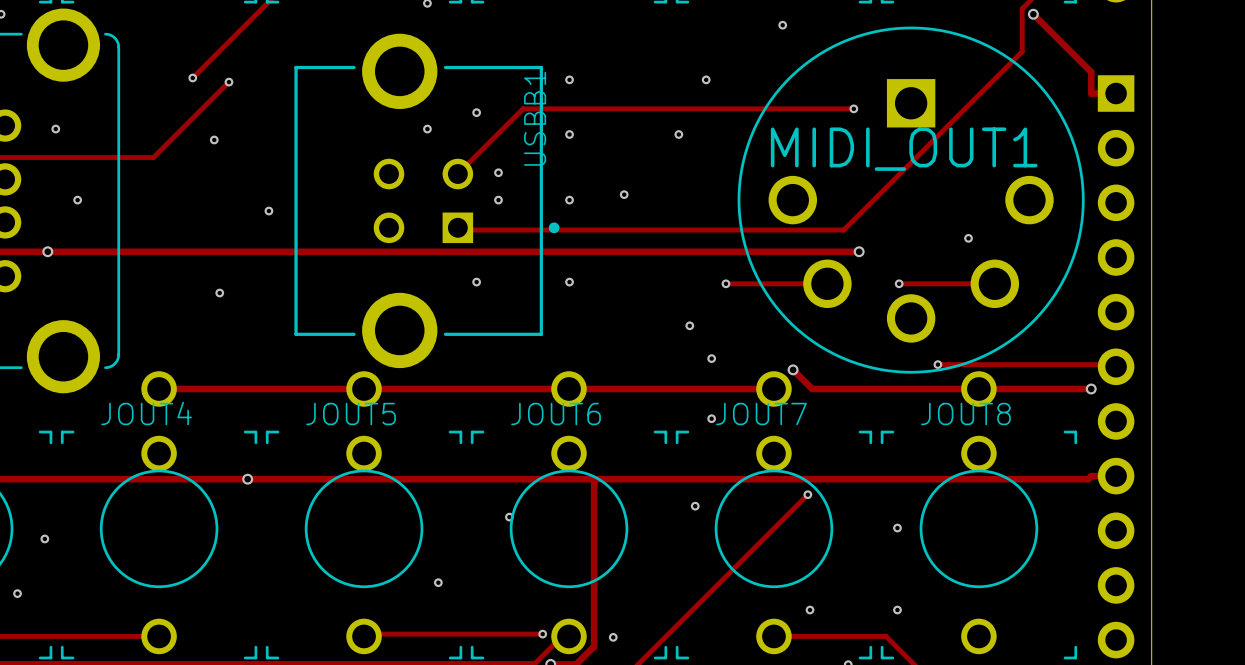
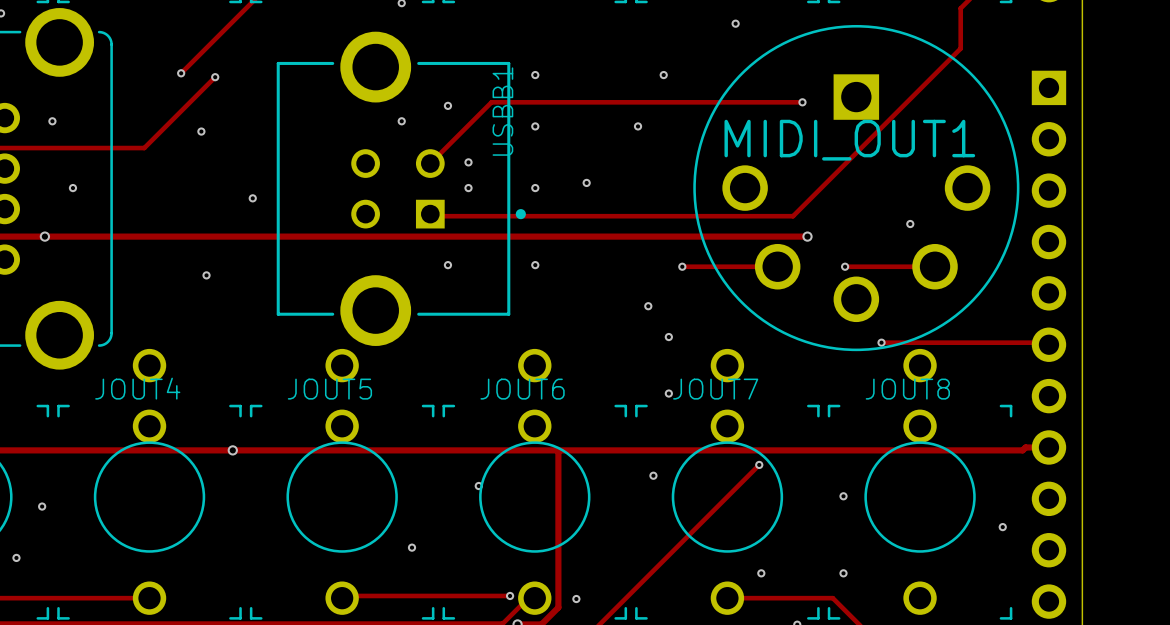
track: (1033, 14) (1091, 72) (1091, 93) (1116, 93) -> none
via: (1033, 14) -> none
track: (793, 369) (812, 388) (1091, 388) -> none
via: (793, 369) -> none
track: (159, 388) (773, 388) -> none
via: (1091, 388) -> none
via: none -> (1002, 527)

